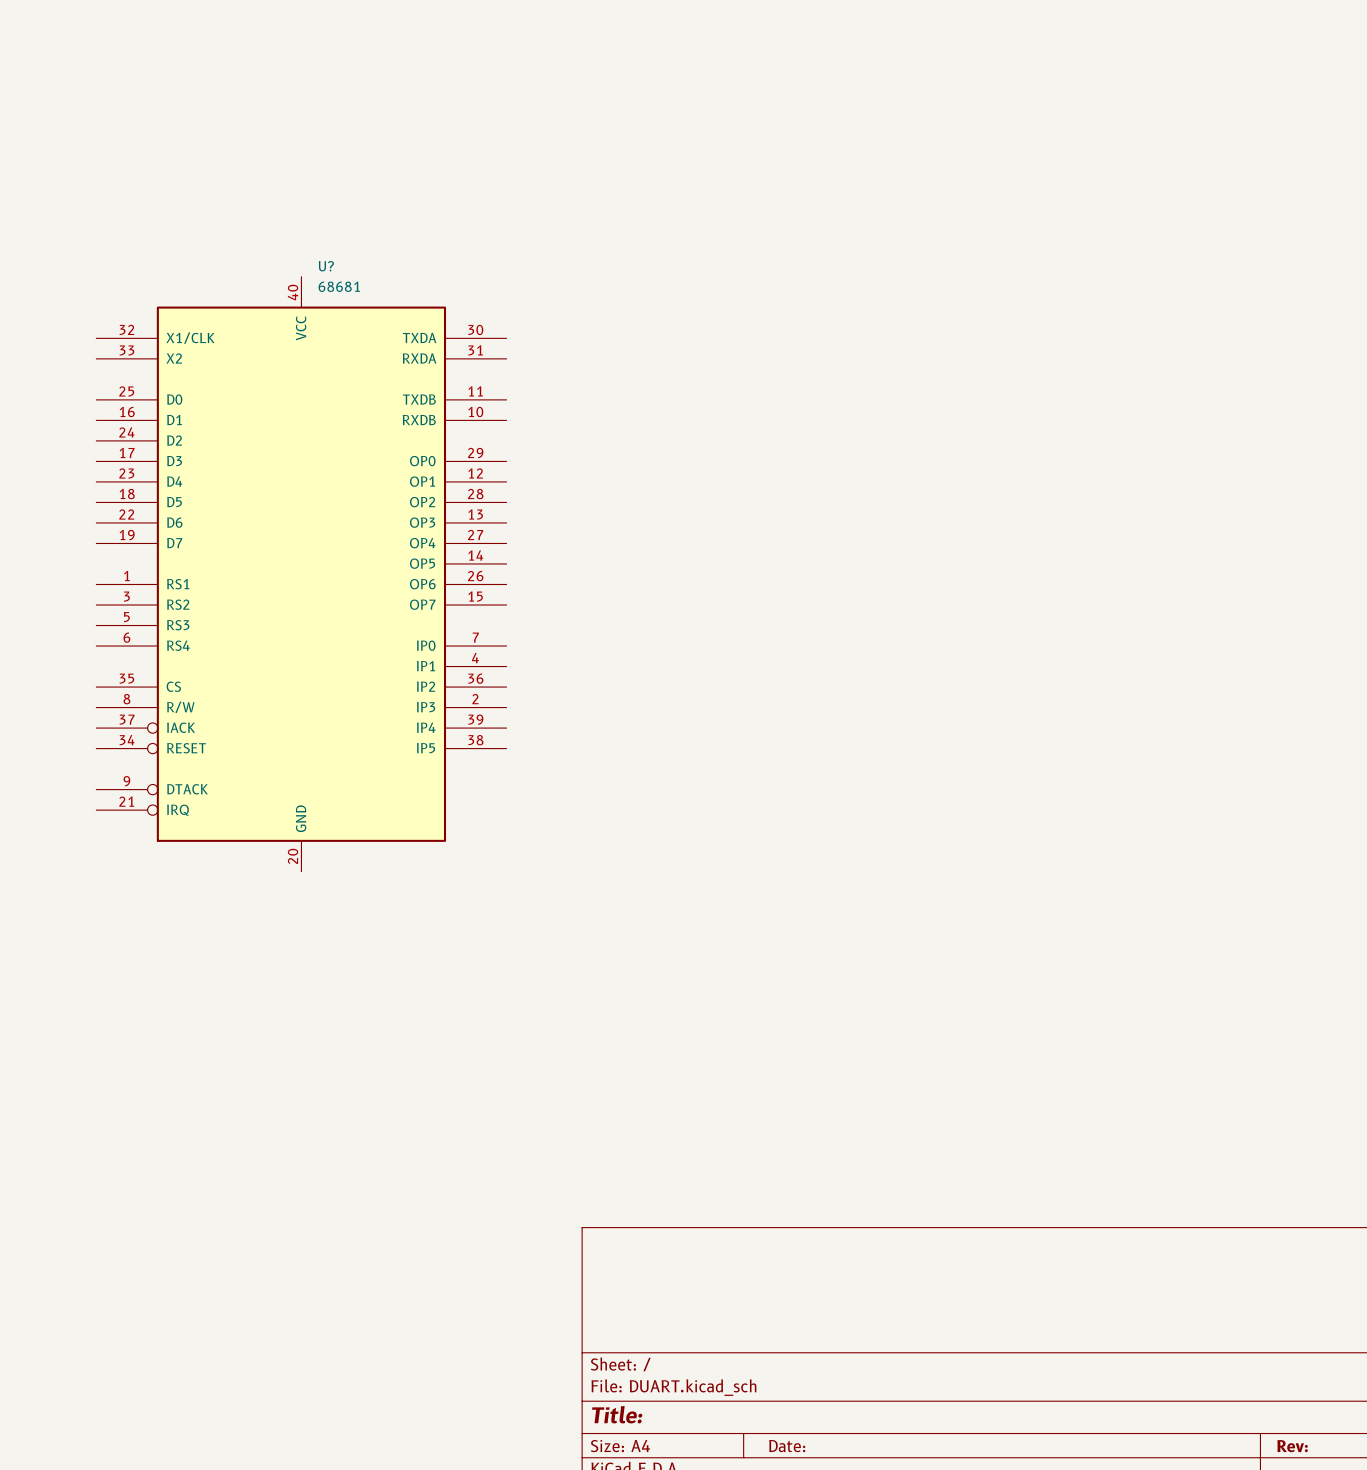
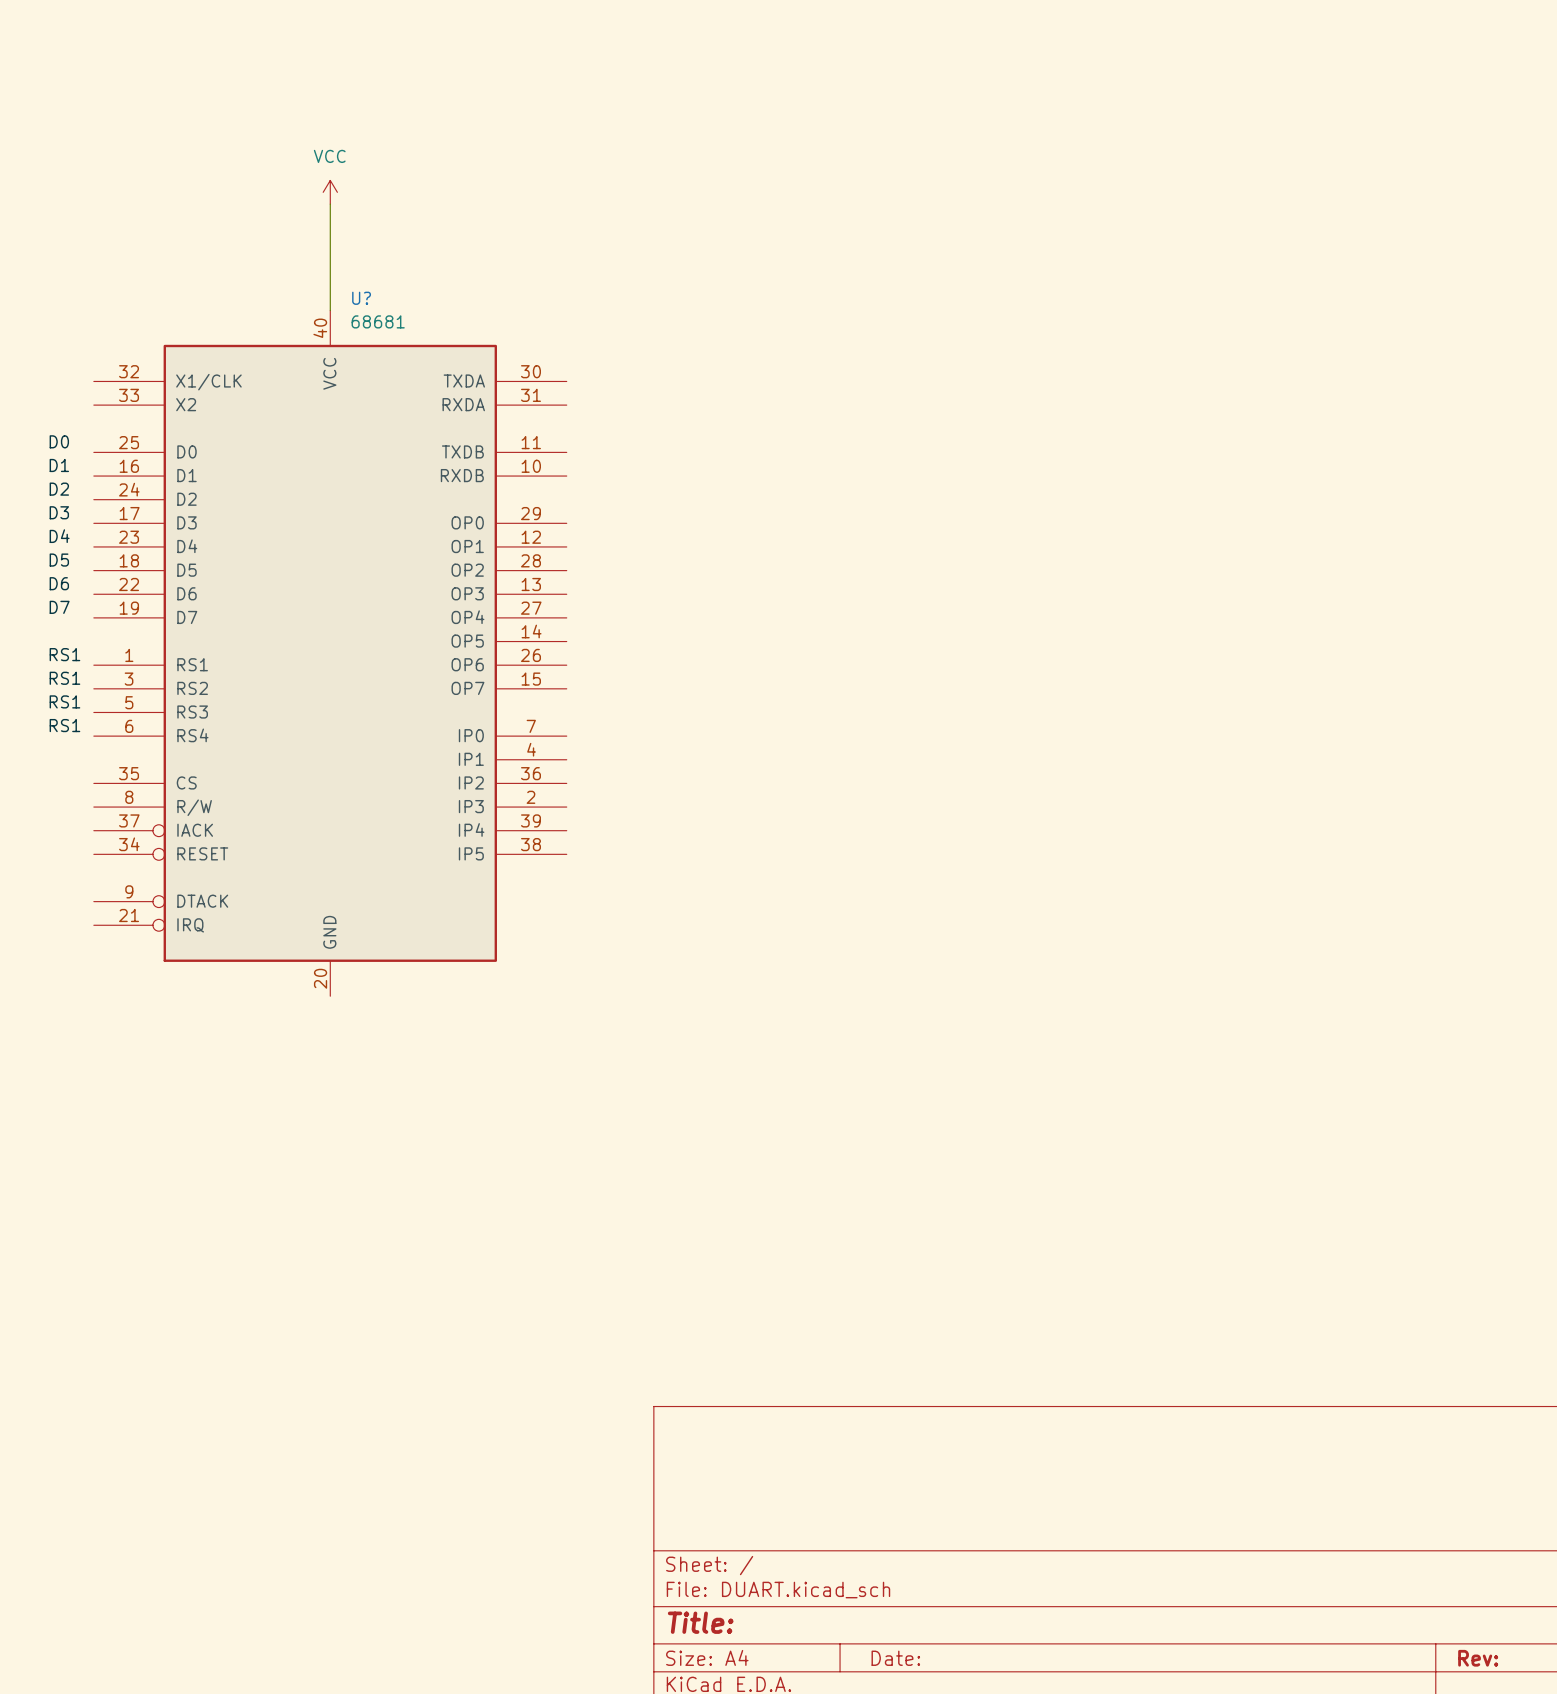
power symbol: none -> VCC (330, 192)
wire: none -> (330, 204) (330, 310)
label: none -> D0 (59, 441)
label: none -> D1 (59, 465)
label: none -> D2 (59, 489)
label: none -> D3 (59, 512)
label: none -> D4 (59, 536)
label: none -> D5 (59, 560)
label: none -> D6 (59, 583)
label: none -> D7 (59, 607)
label: none -> RS1 (64, 654)
label: none -> RS1 (64, 678)
label: none -> RS1 (64, 701)
label: none -> RS1 (64, 725)

